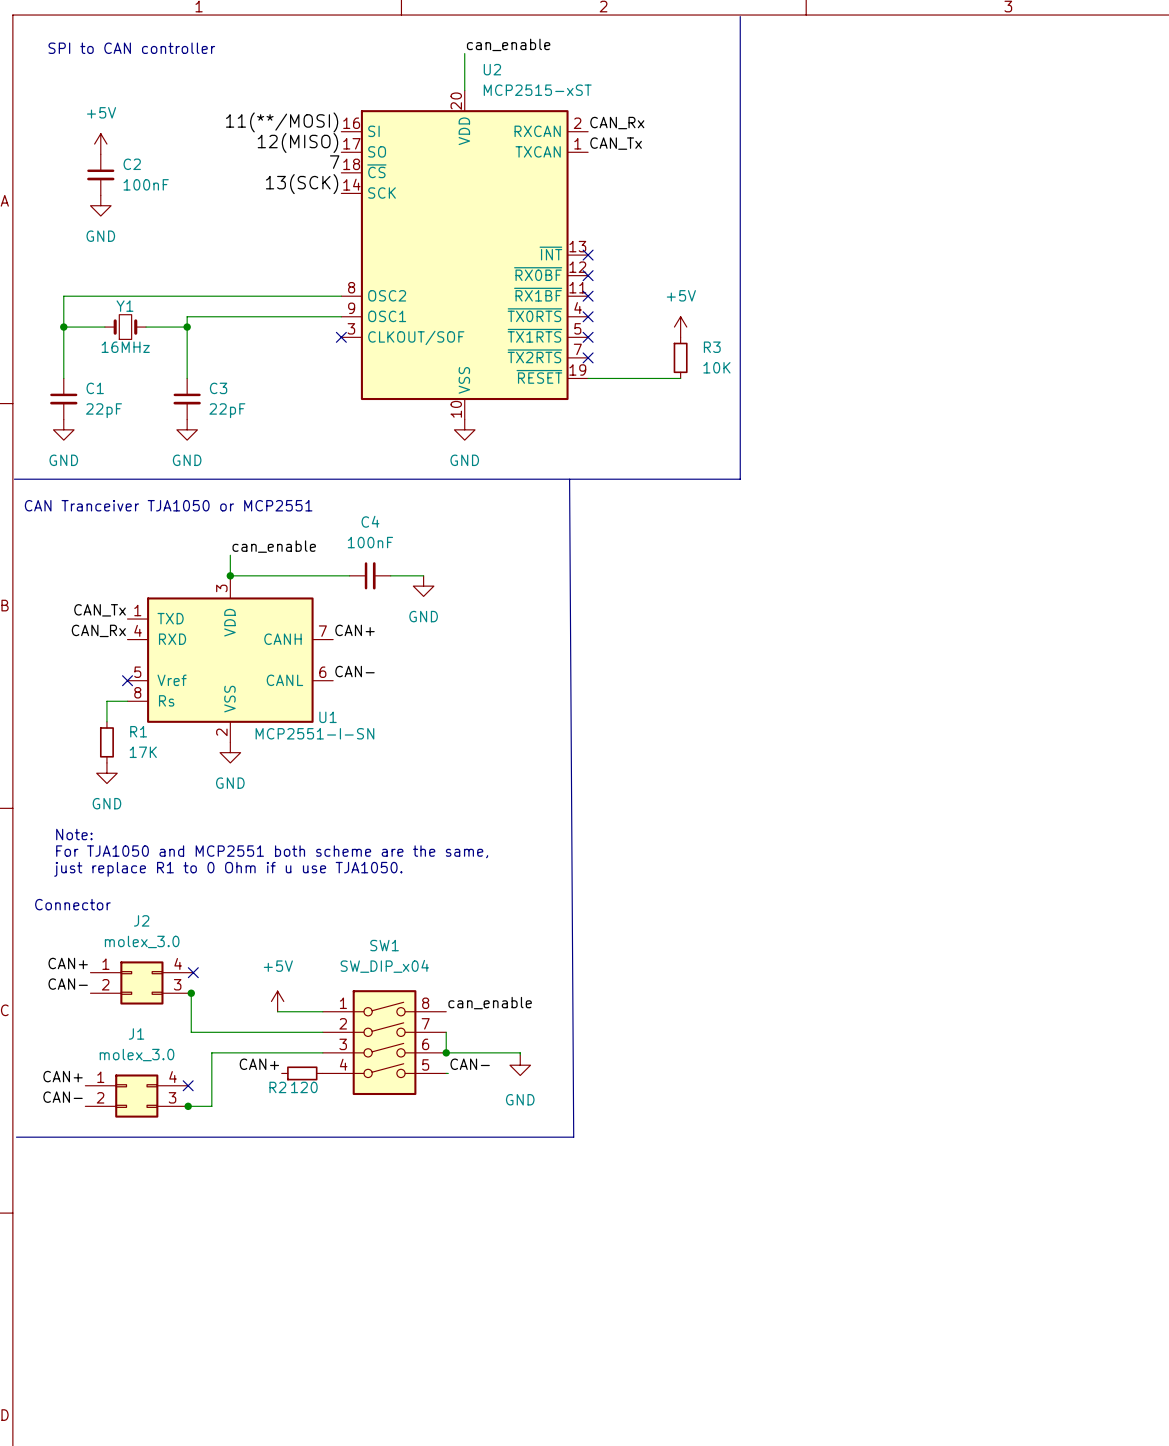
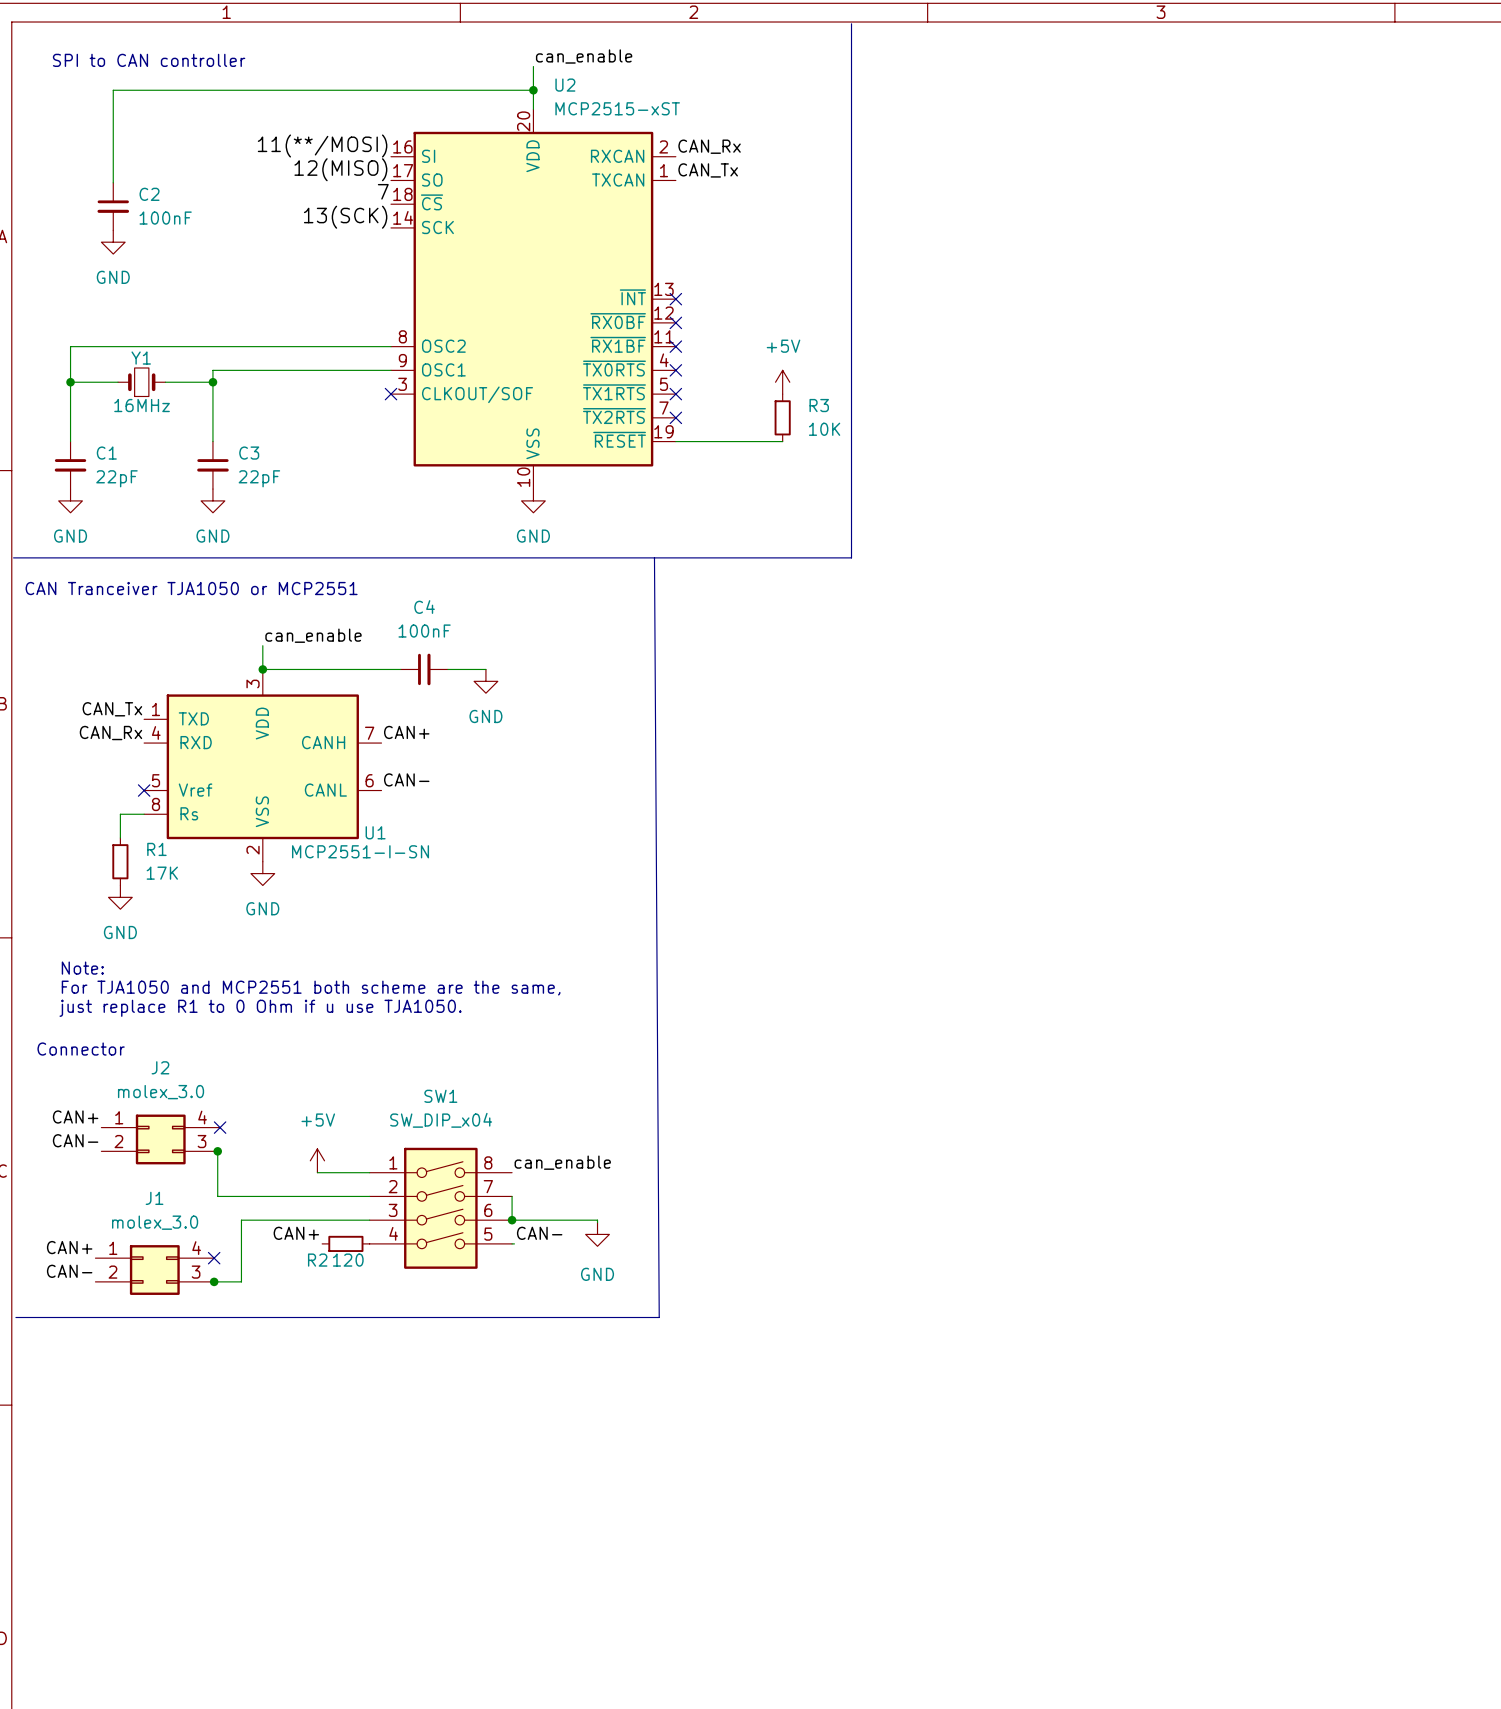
wire: none -> (533, 90) (113, 90) (113, 182)
junction: none -> (533, 90)
power symbol: +5V (100, 144) -> none

